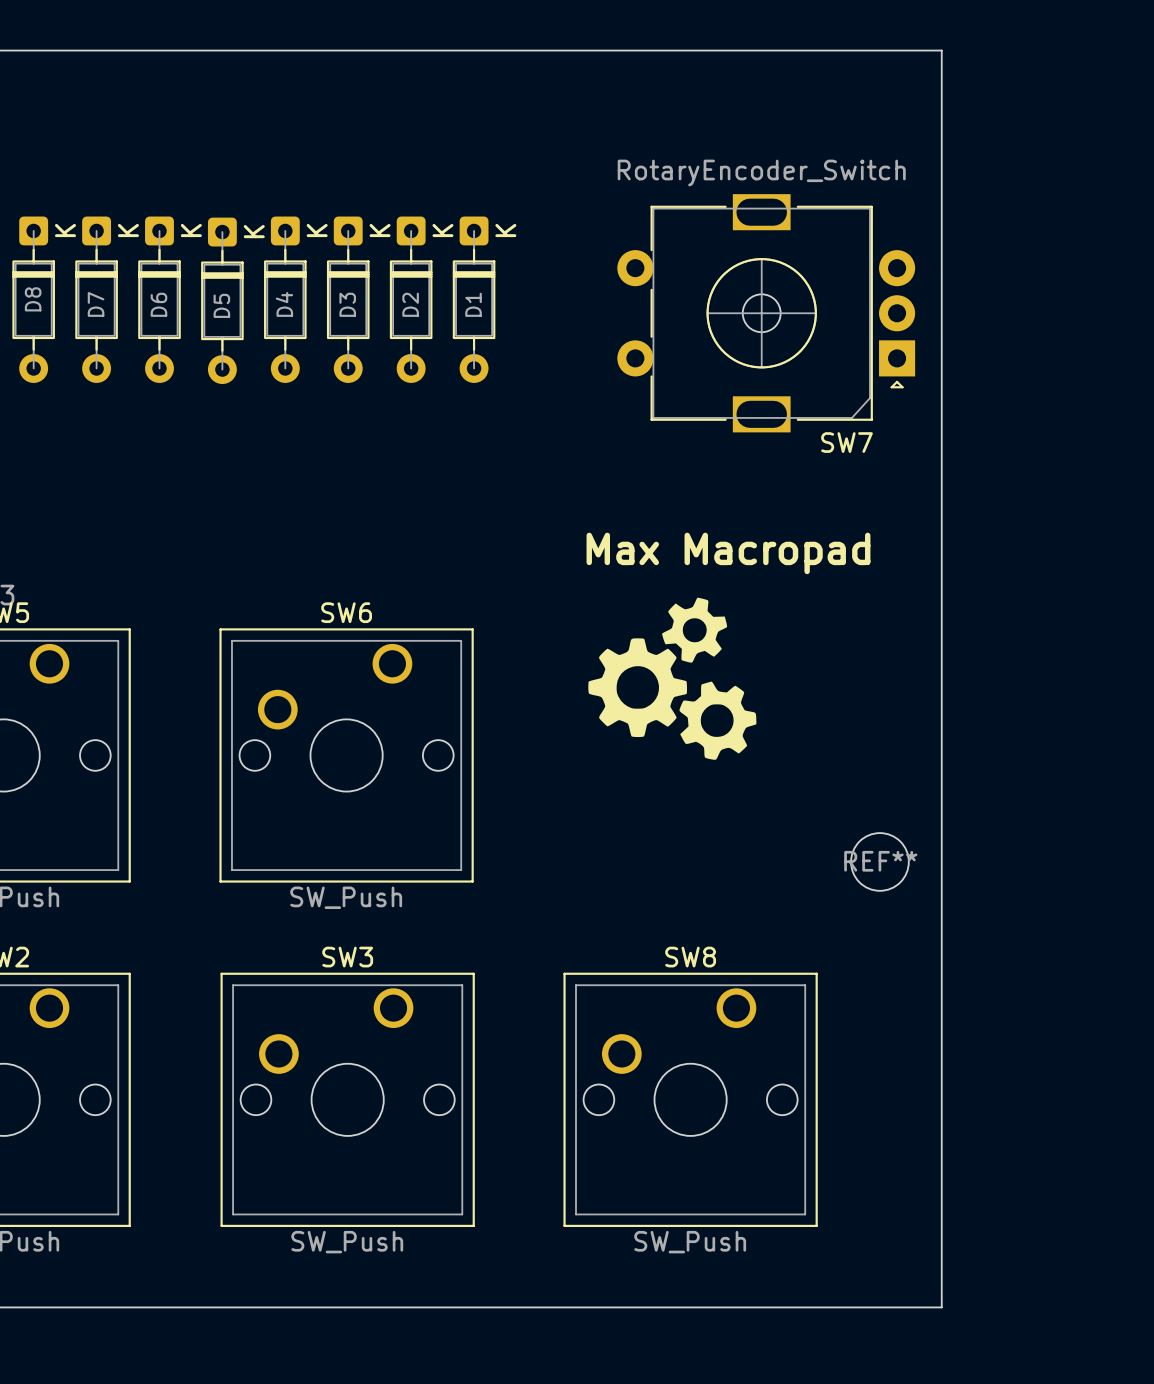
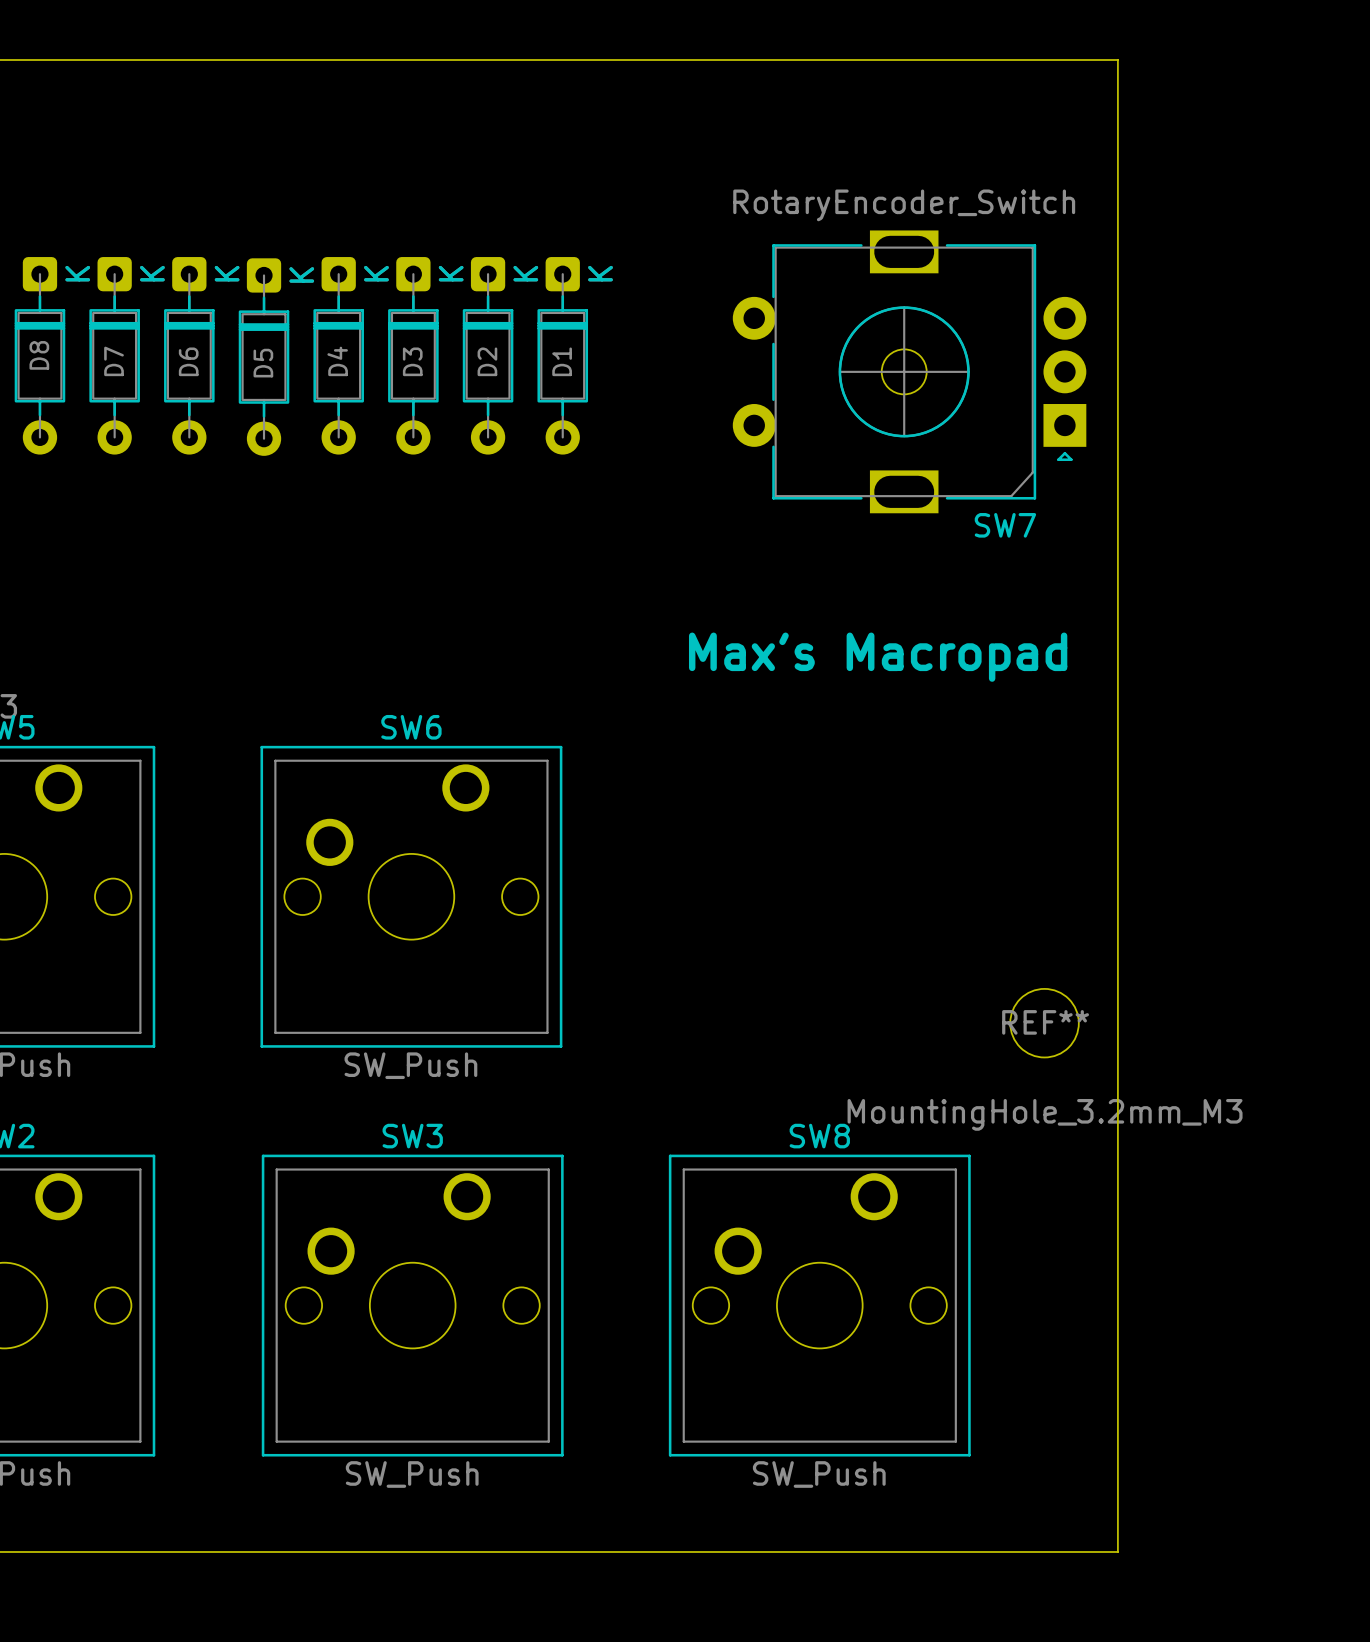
text: Max Macropad (728, 553) -> Max's Macropad (878, 657)
drawing: [588, 597, 757, 760] -> none
REF** value: none -> MountingHole_3.2mm_M3 (1045, 1114)

